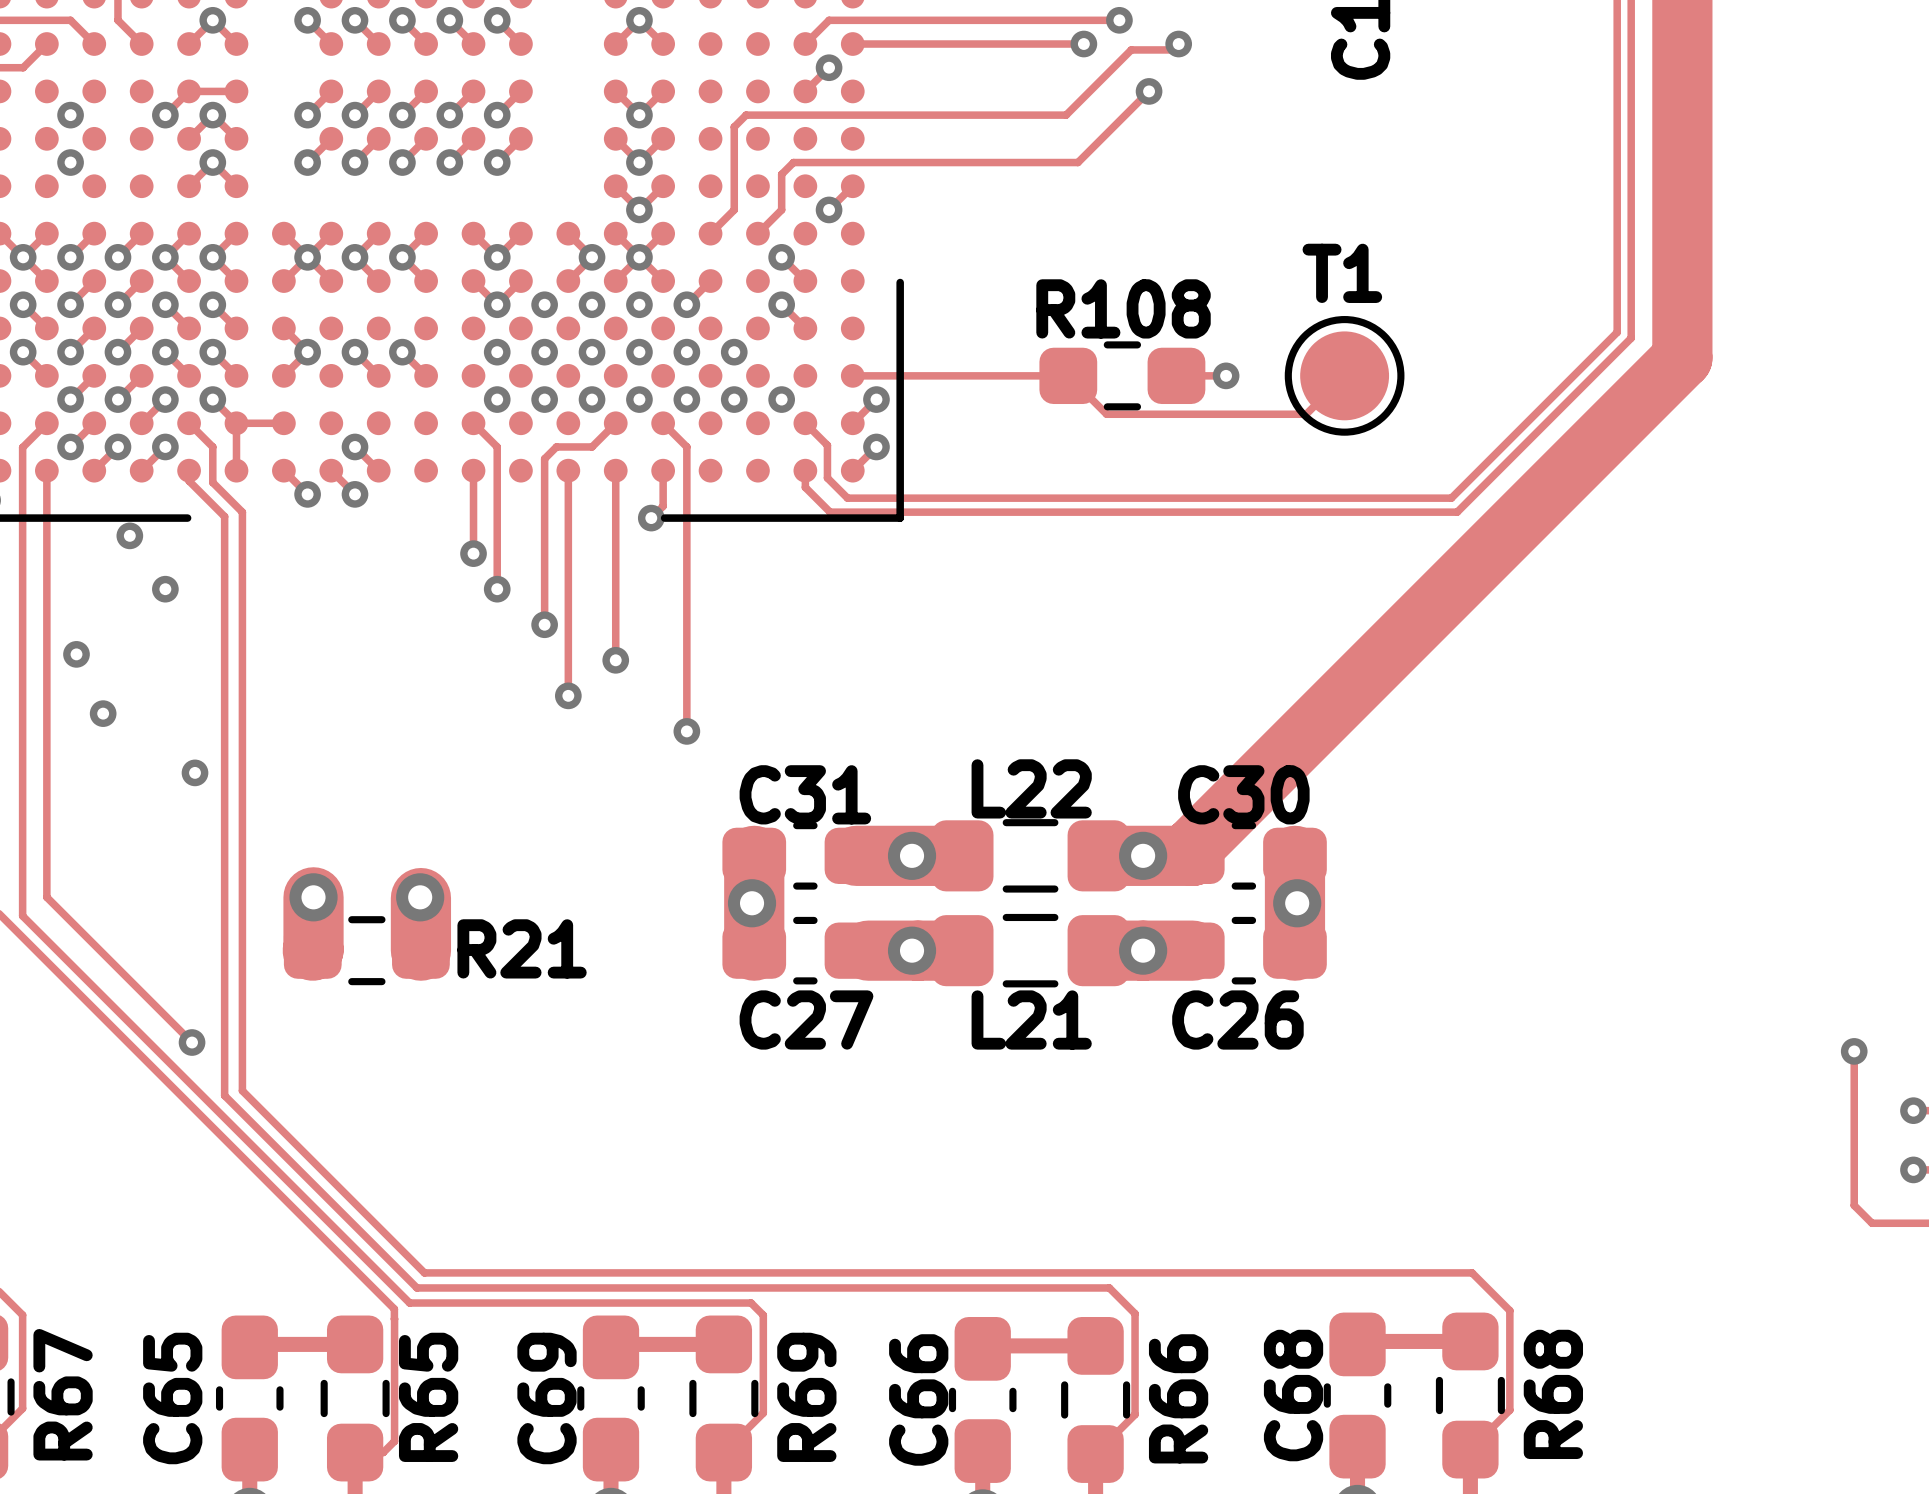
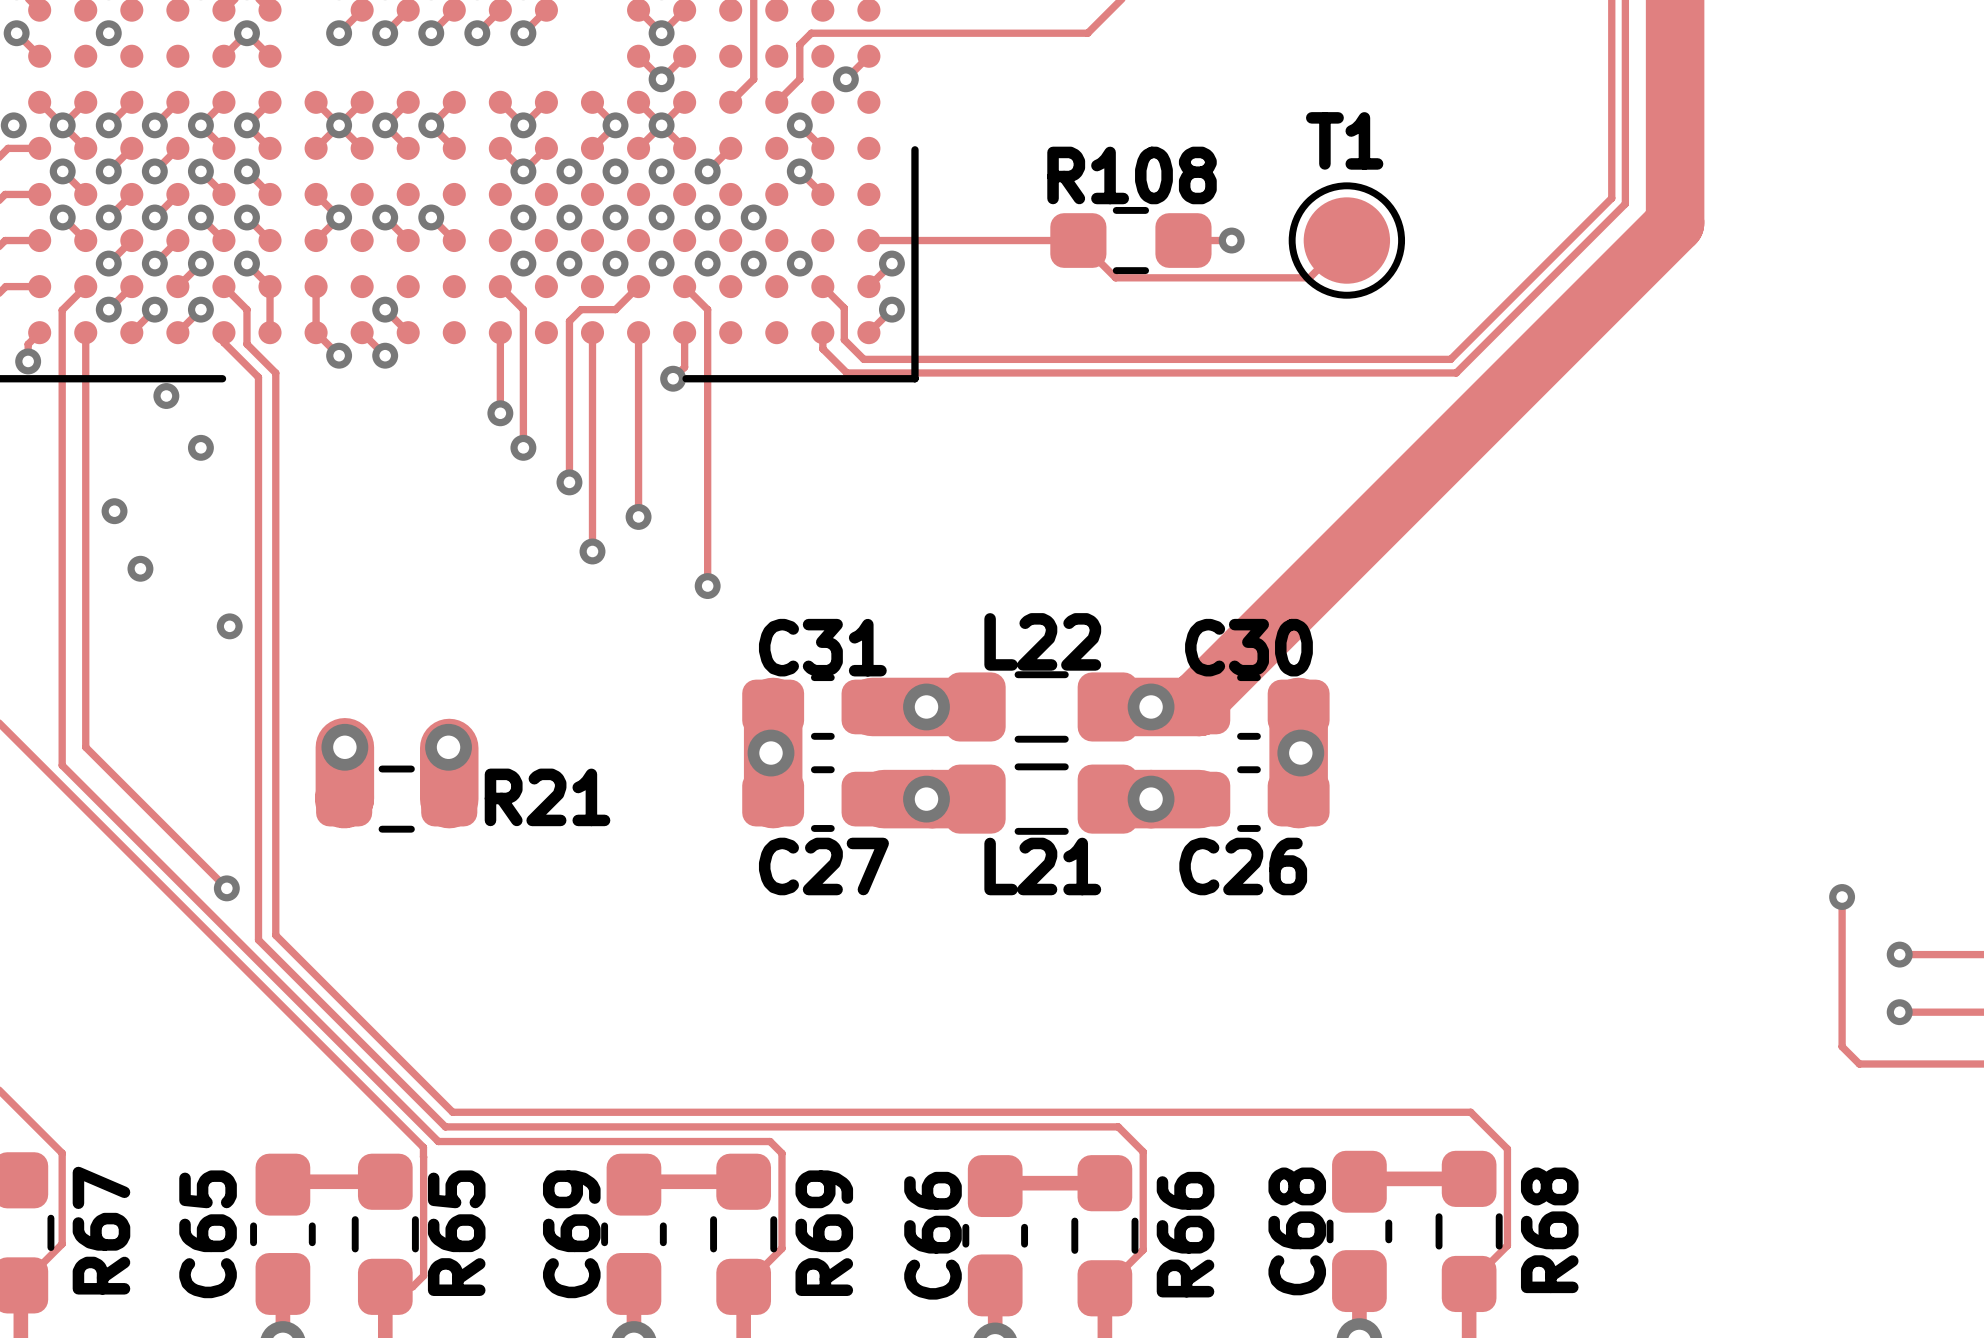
track: (236, 423) (283, 423) -> (316, 332) (316, 286)

